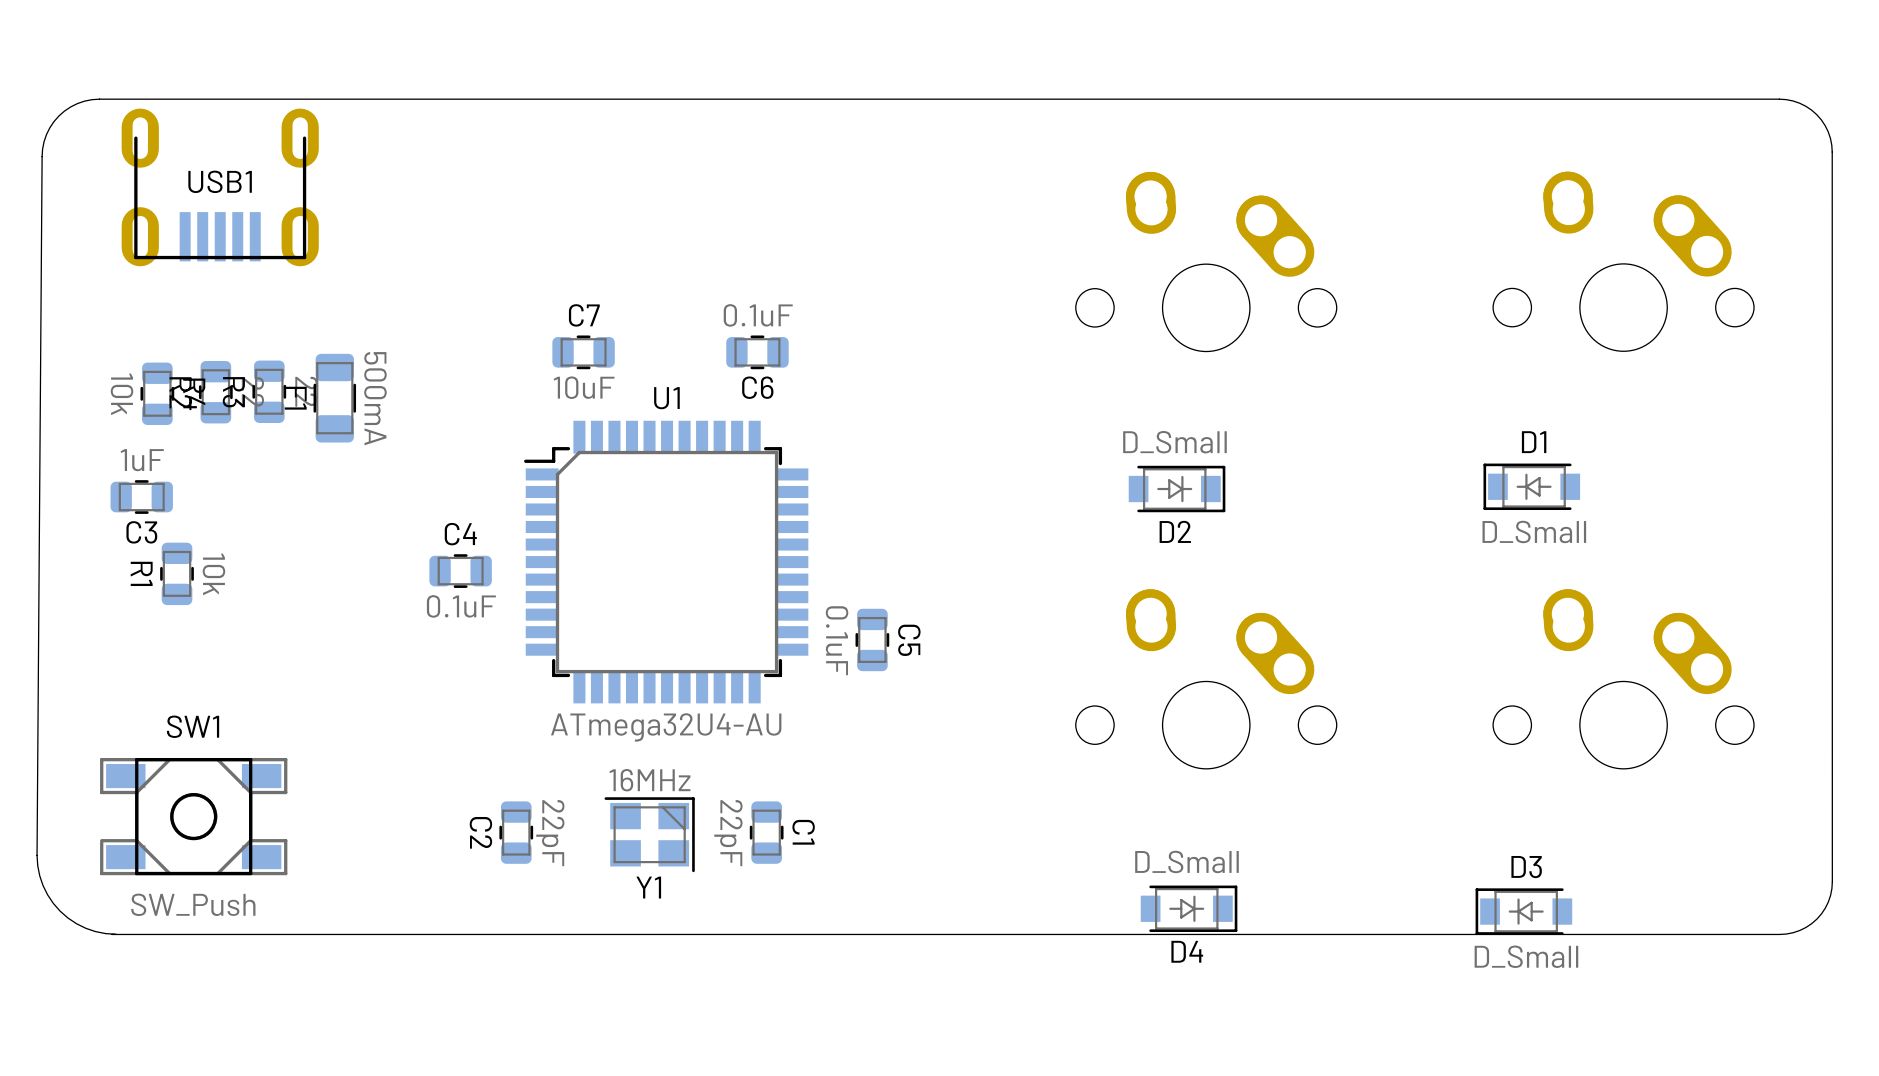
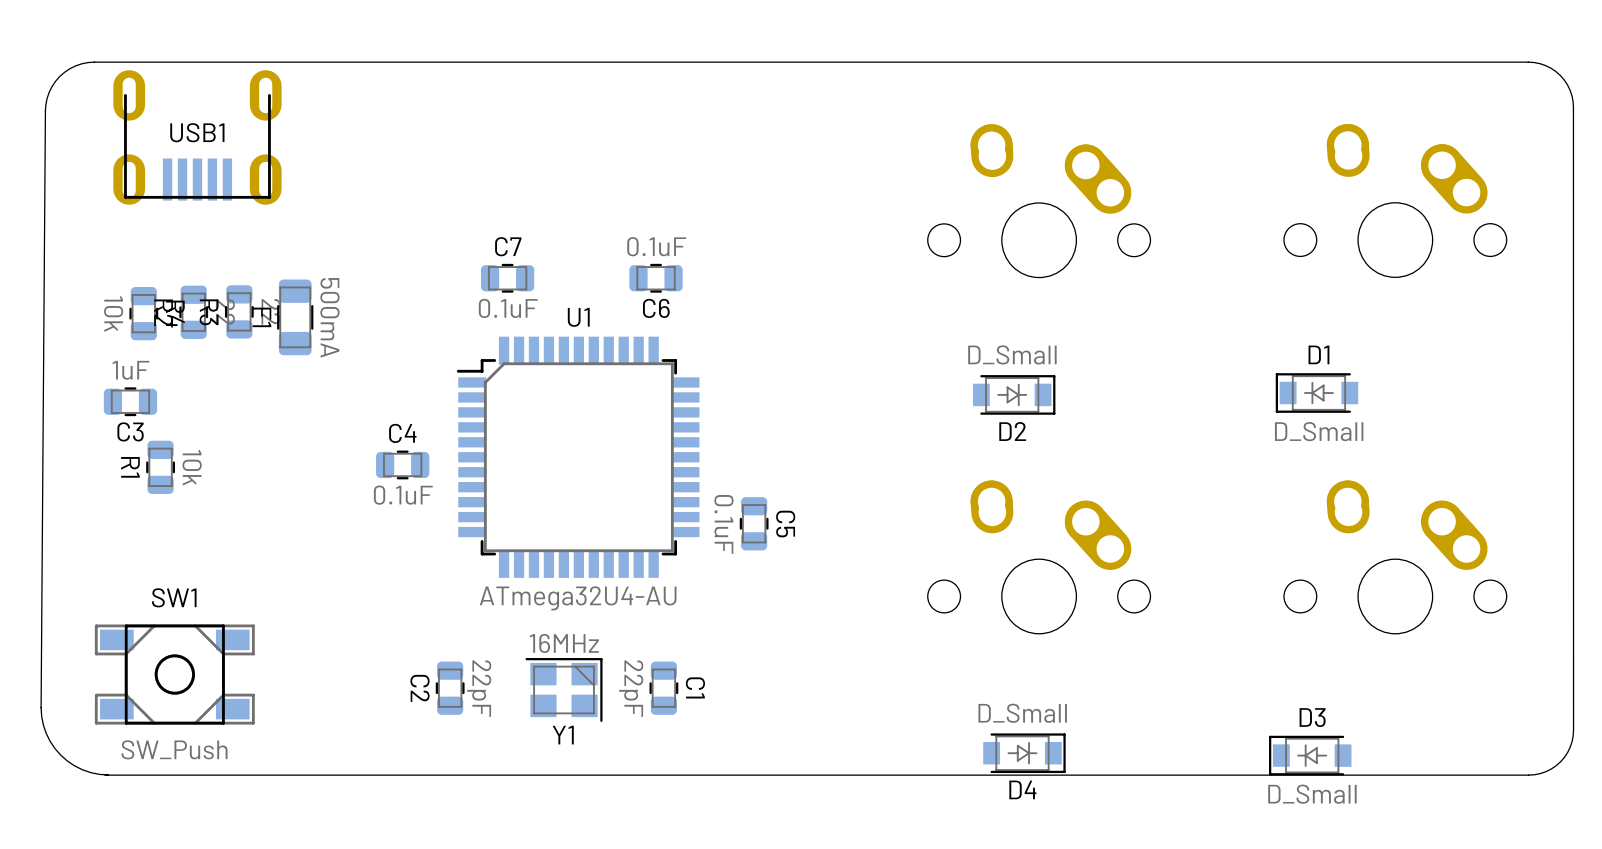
C7 value: 10uF (584, 387) -> 0.1uF (508, 308)

